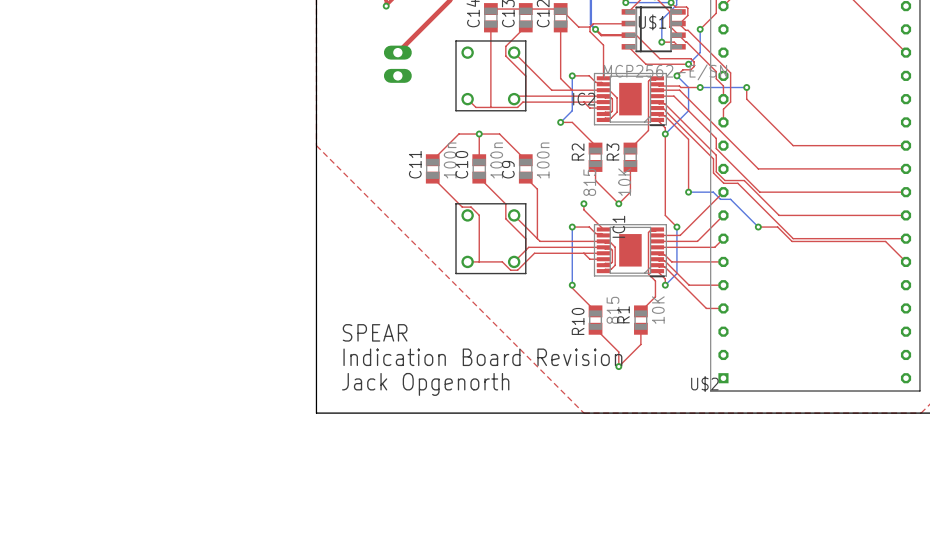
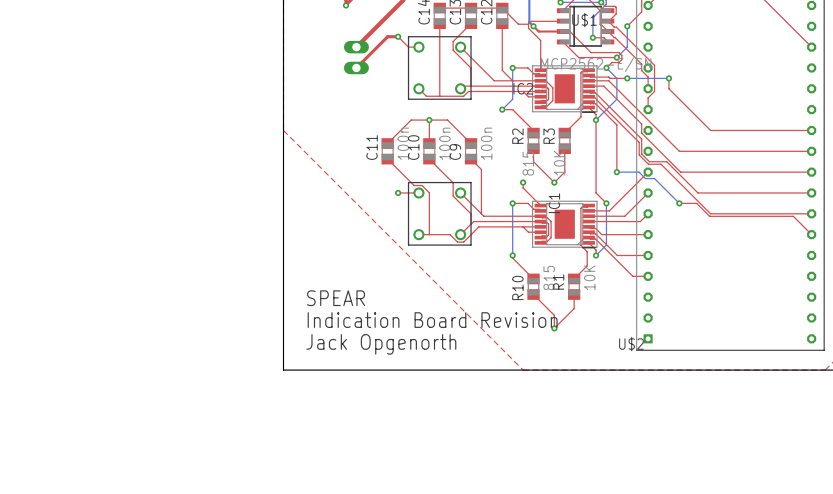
via: none -> (398, 36)
top track: none -> (418, 47) (408, 47) (398, 36) (387, 36) (356, 67)
top track: none -> (398, 192) (418, 192)
via: none -> (398, 192)

